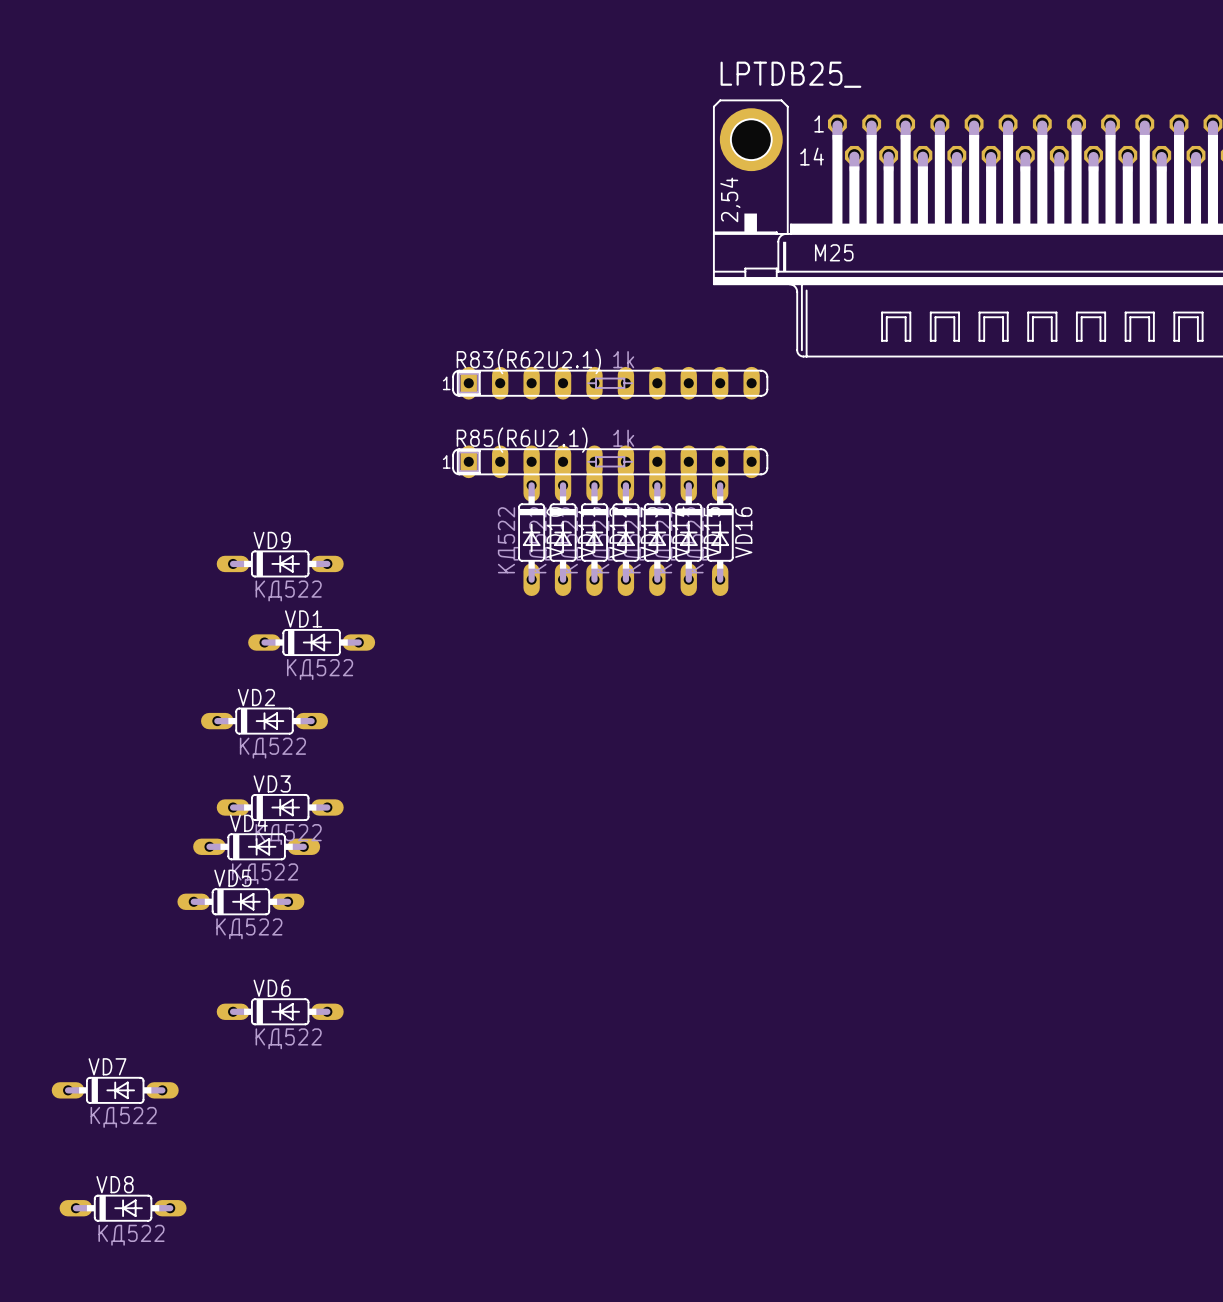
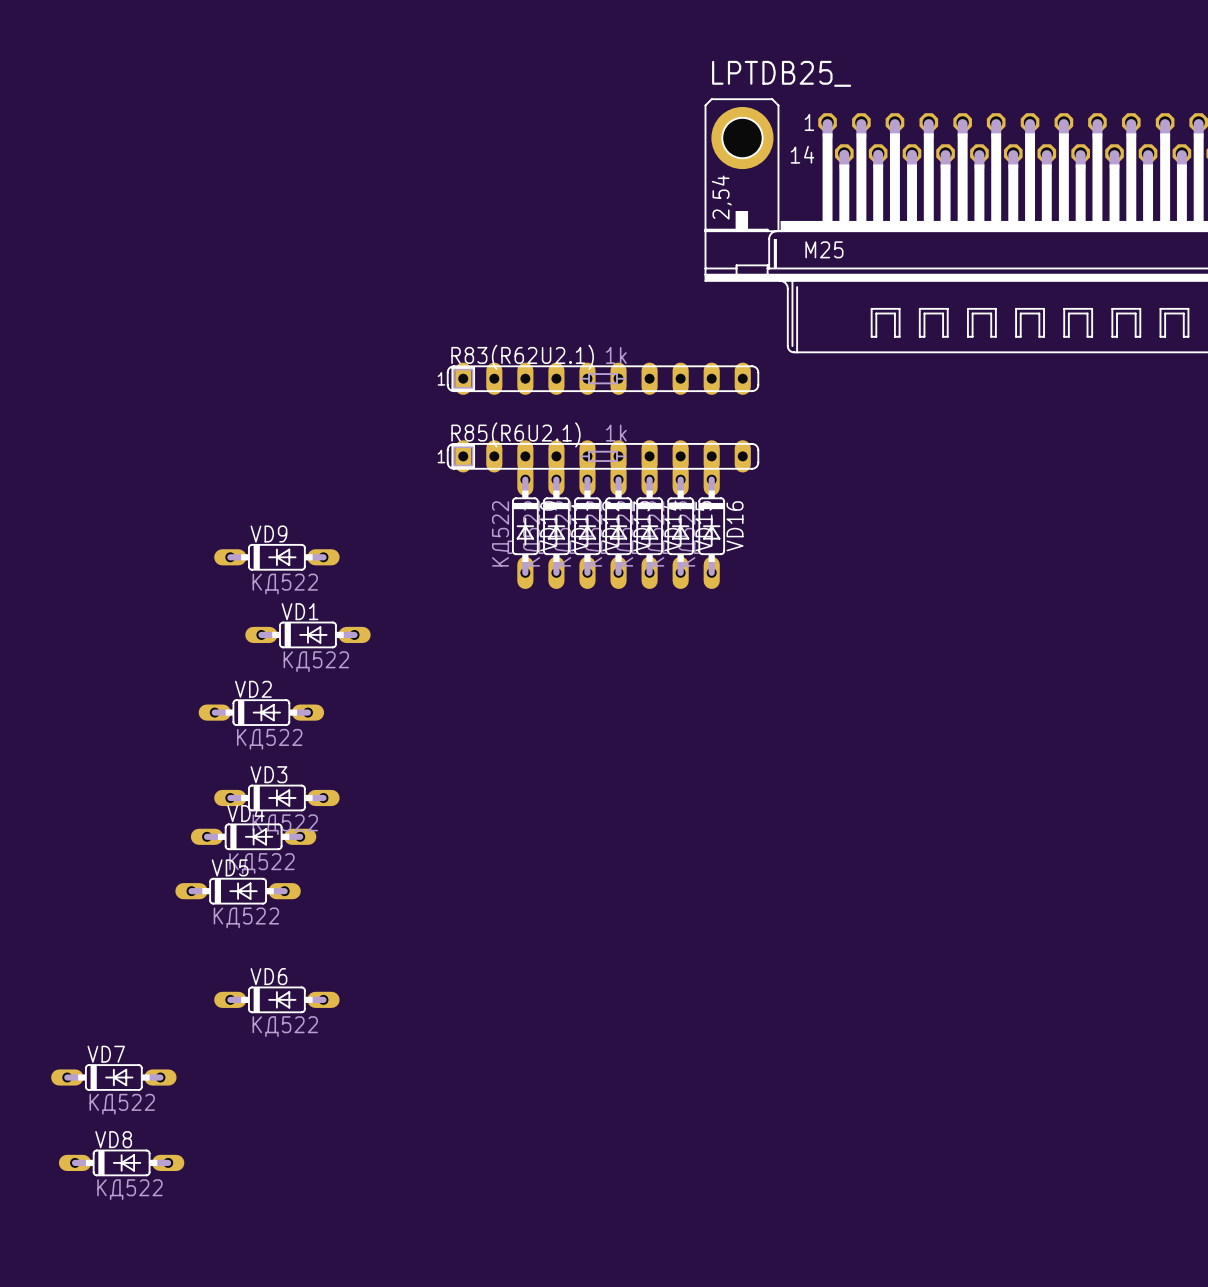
VD8 position: (123, 1208) -> (121, 1162)

